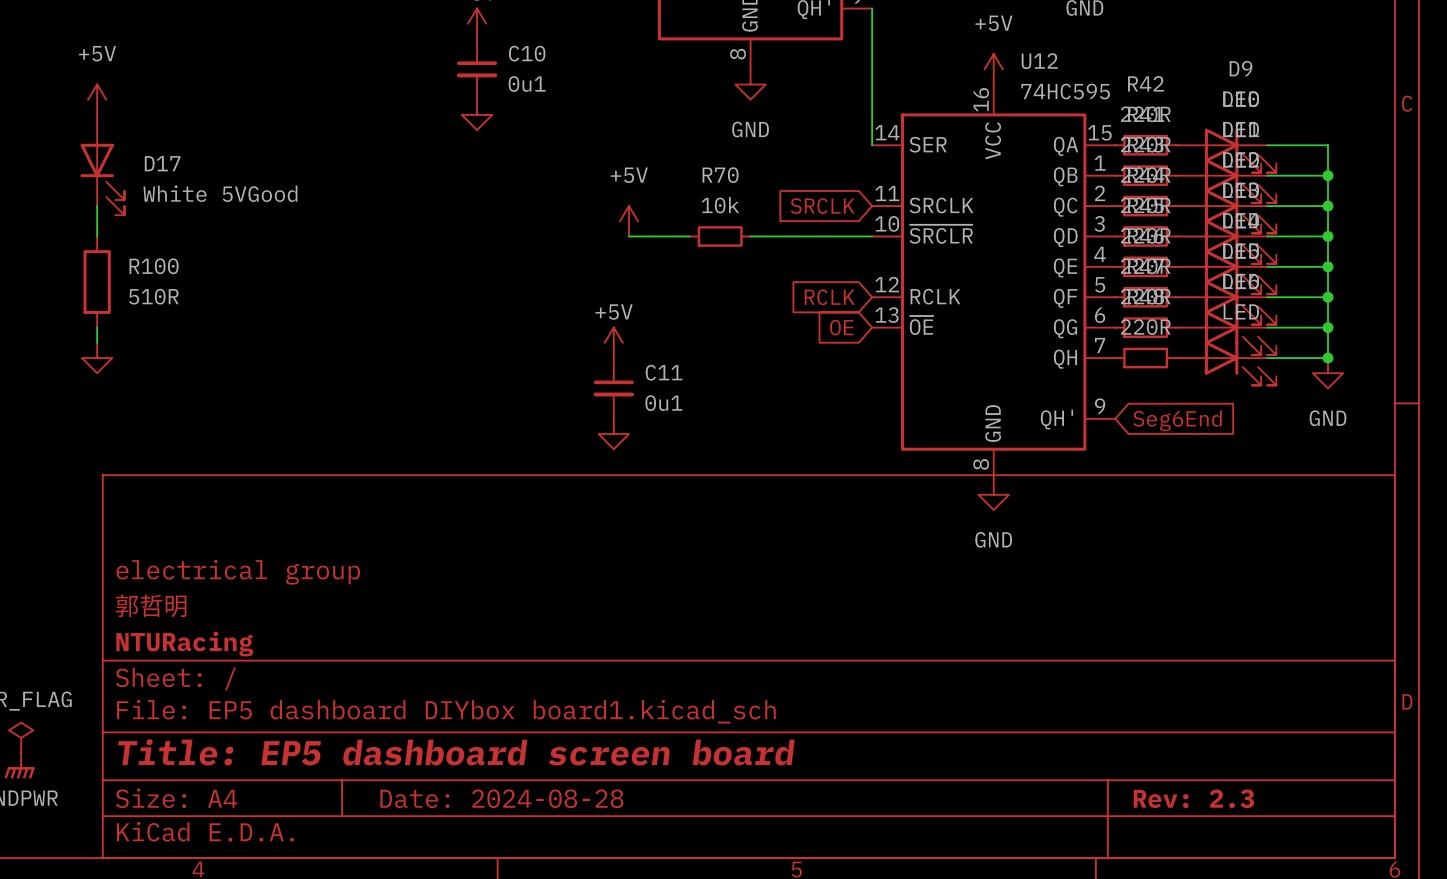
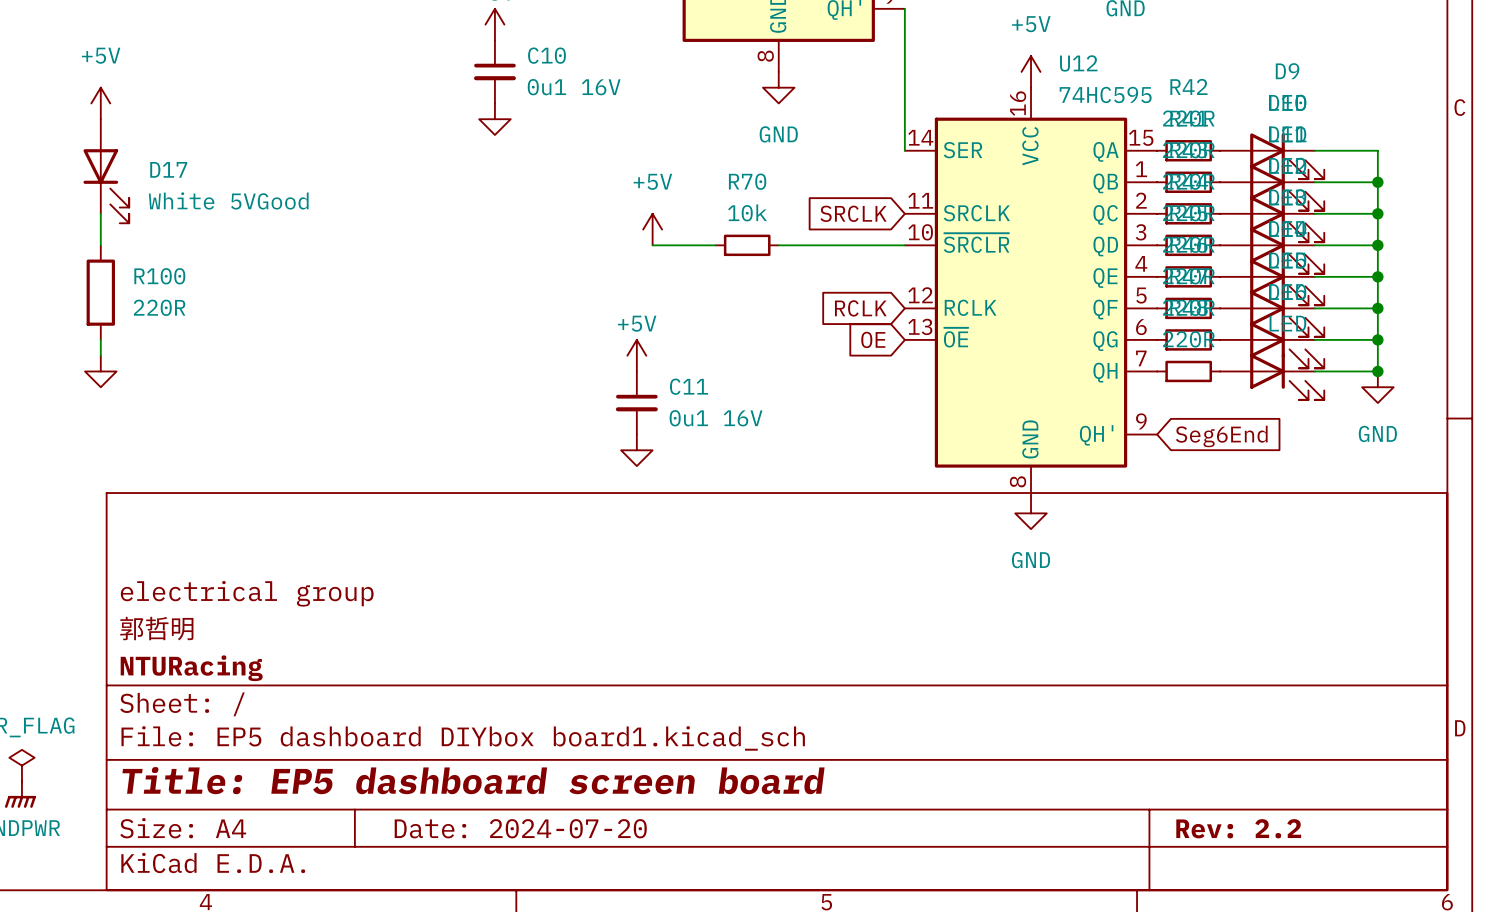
C10 value: 0u1 (527, 84) -> 0u1 16V (574, 87)
R100 value: 510R (153, 296) -> 220R (159, 307)
C11 value: 0u1 (663, 403) -> 0u1 16V (716, 418)
title block: Date: 2024-08-28 (501, 798) -> Date: 2024-07-20 (520, 828)
title block: Rev: 2.3 (1193, 798) -> Rev: 2.2 (1238, 828)

